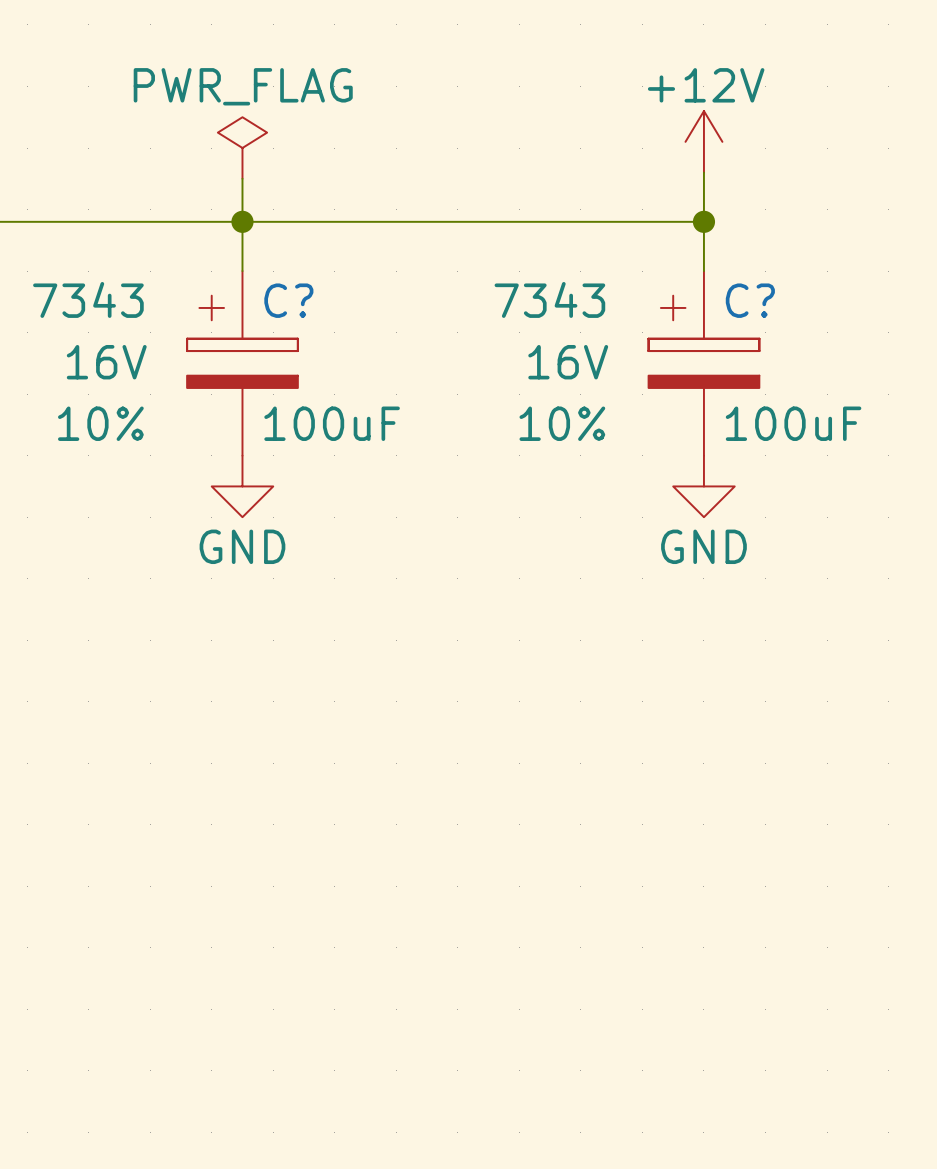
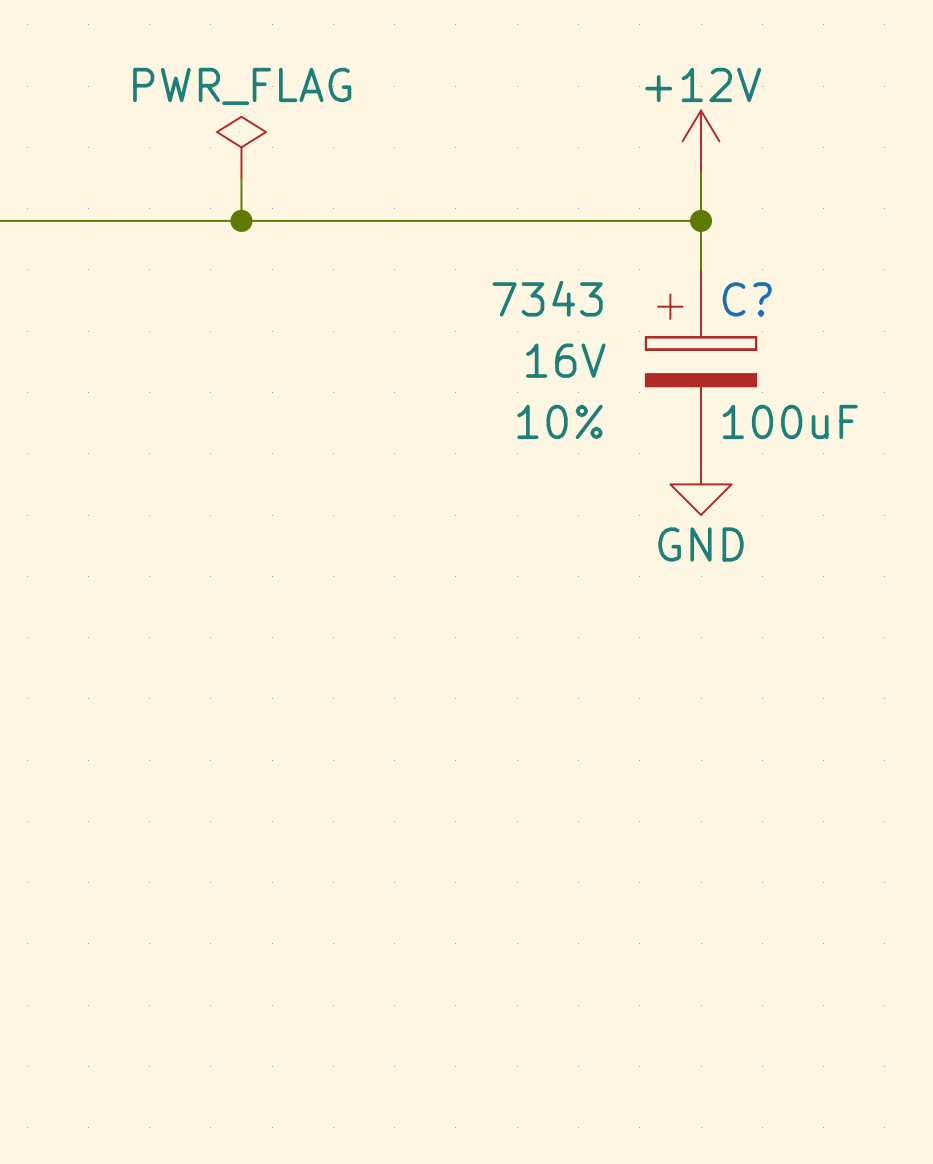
wire: (242, 221) (242, 271) -> none
C?: 100uF (242, 363) -> none
power symbol: GND (242, 486) -> none

